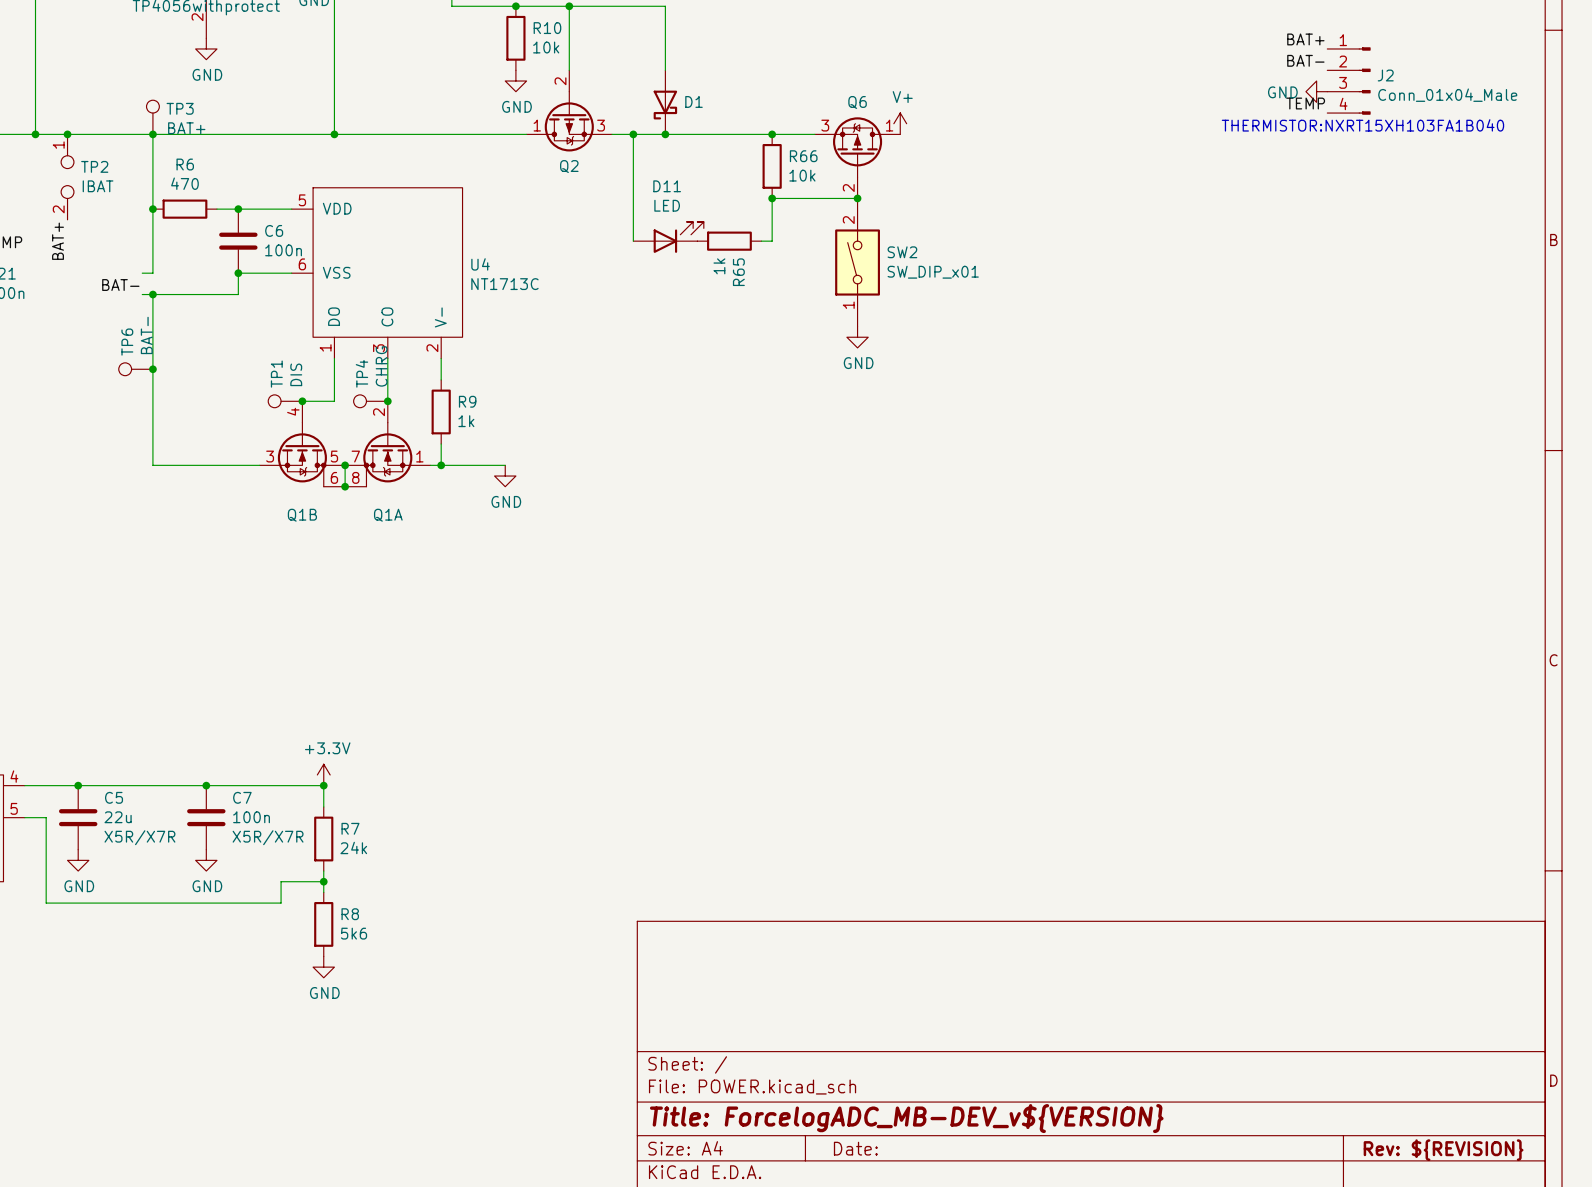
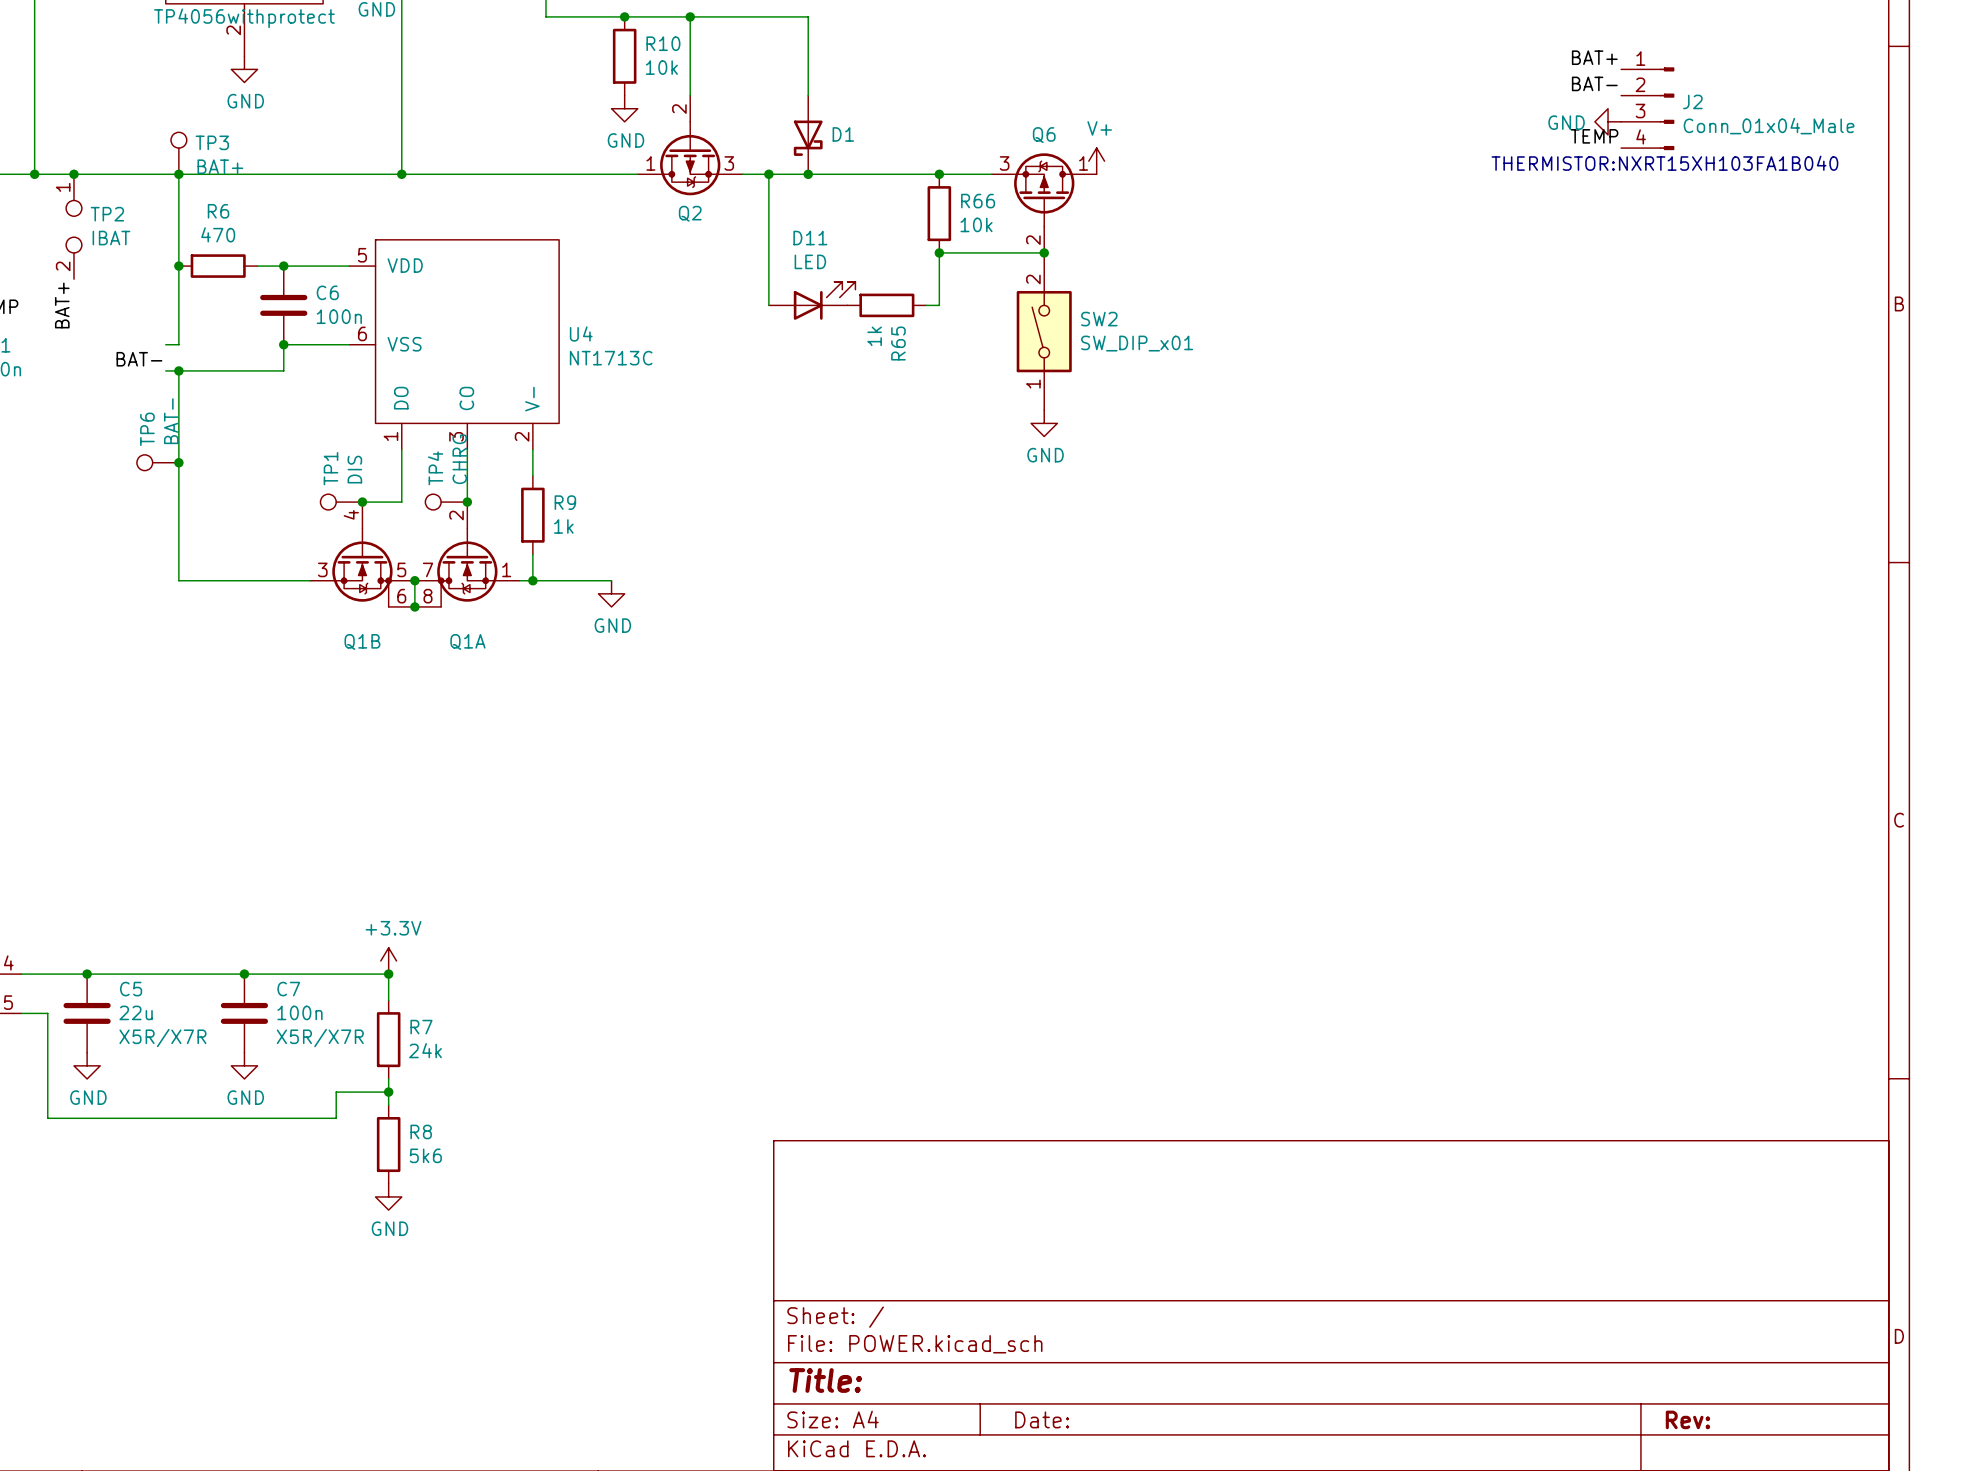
title block: Title: ForcelogADC_MB-DEV_v${VERSION} (906, 1118) -> Title: (825, 1380)
title block: Rev: ${REVISION} (1443, 1150) -> Rev: (1687, 1419)

